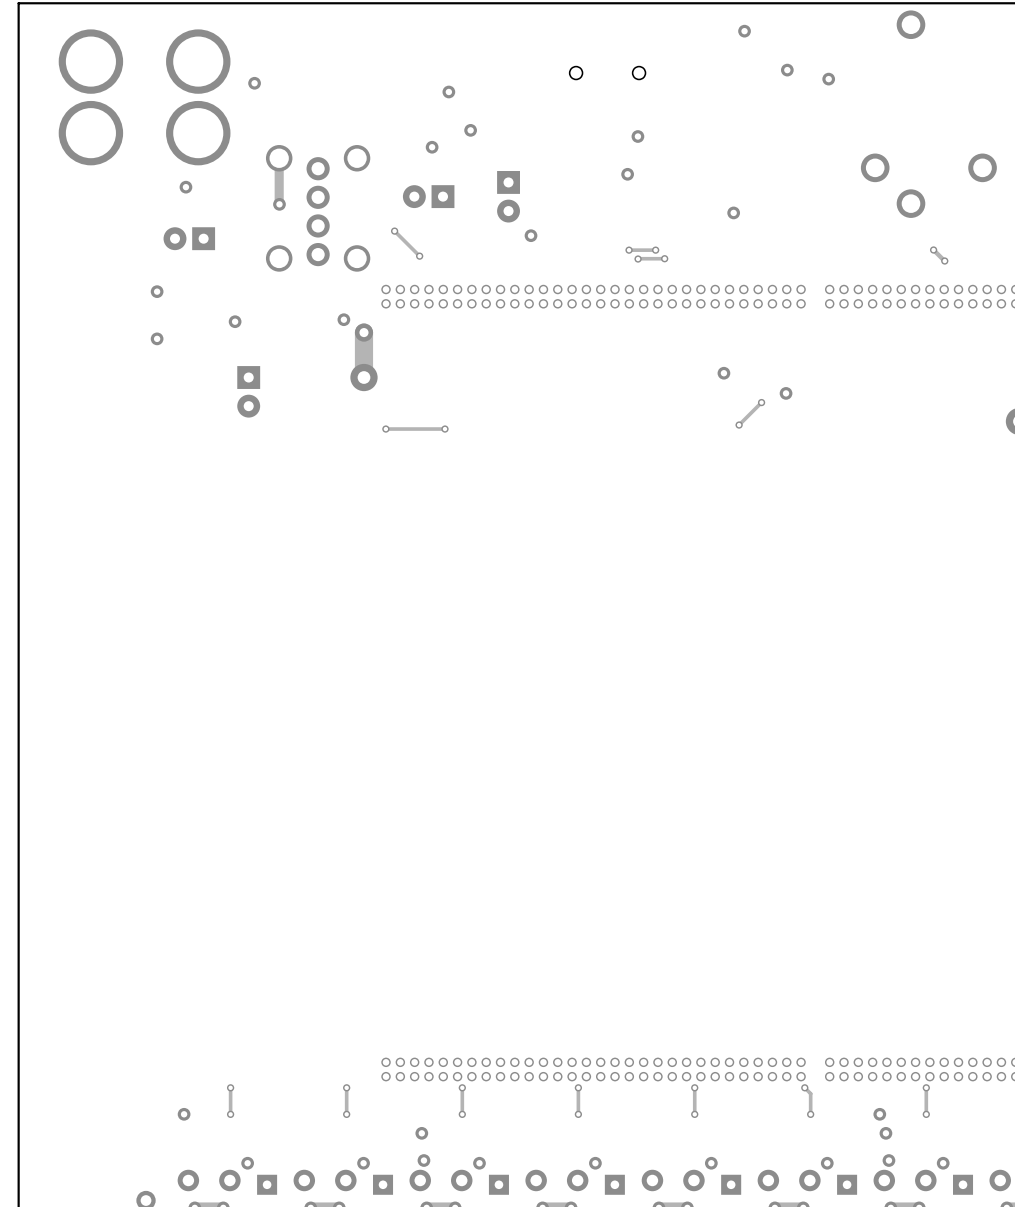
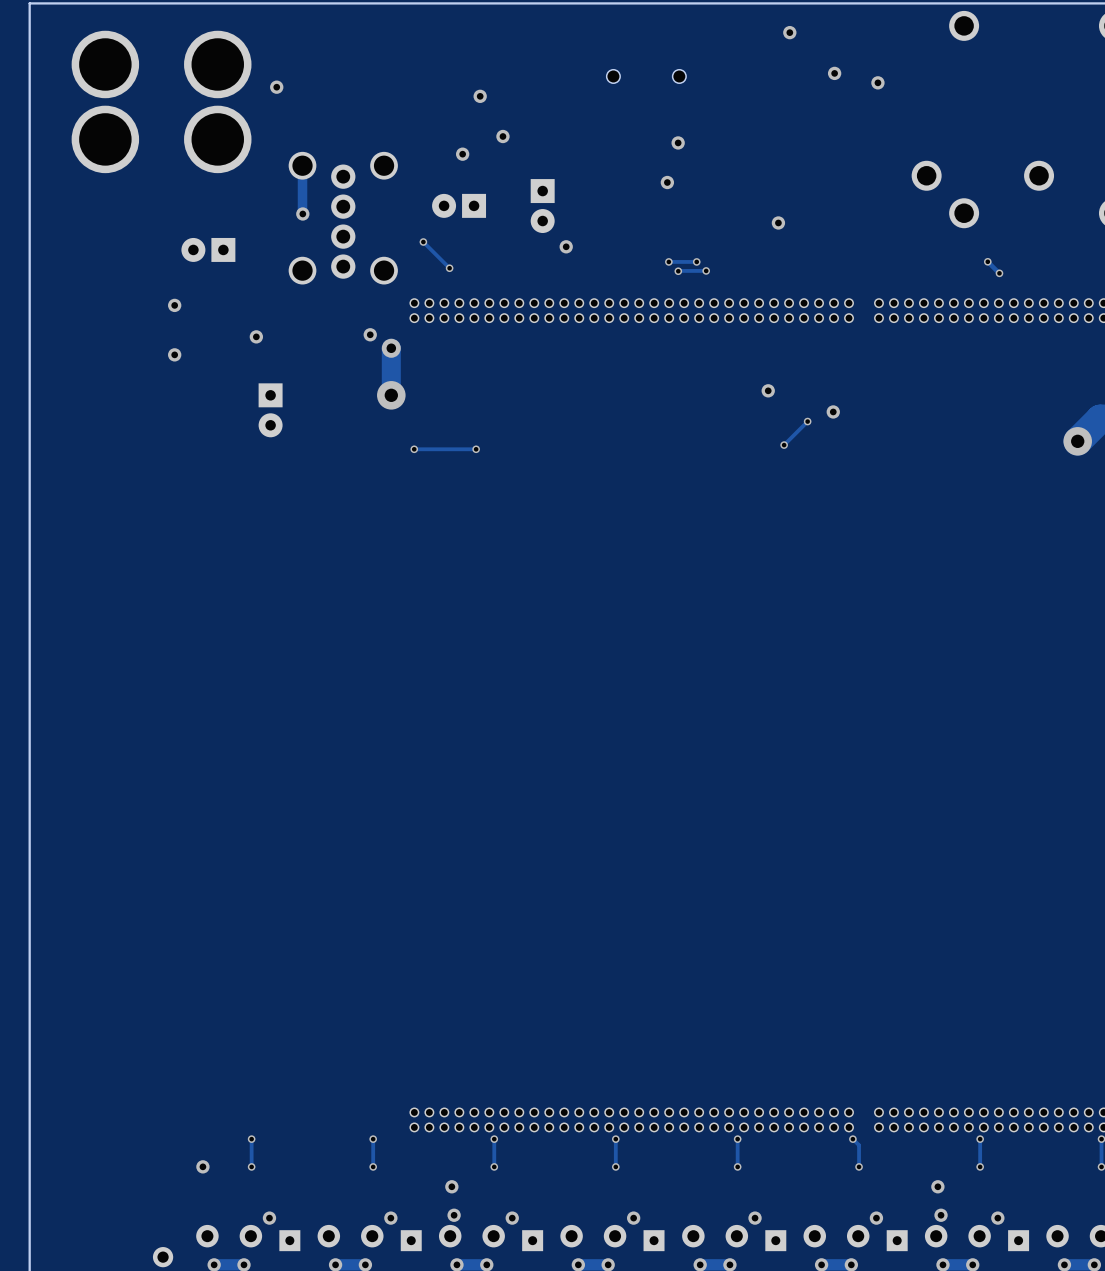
via: (185, 187) -> none
via: (879, 1114) -> none

